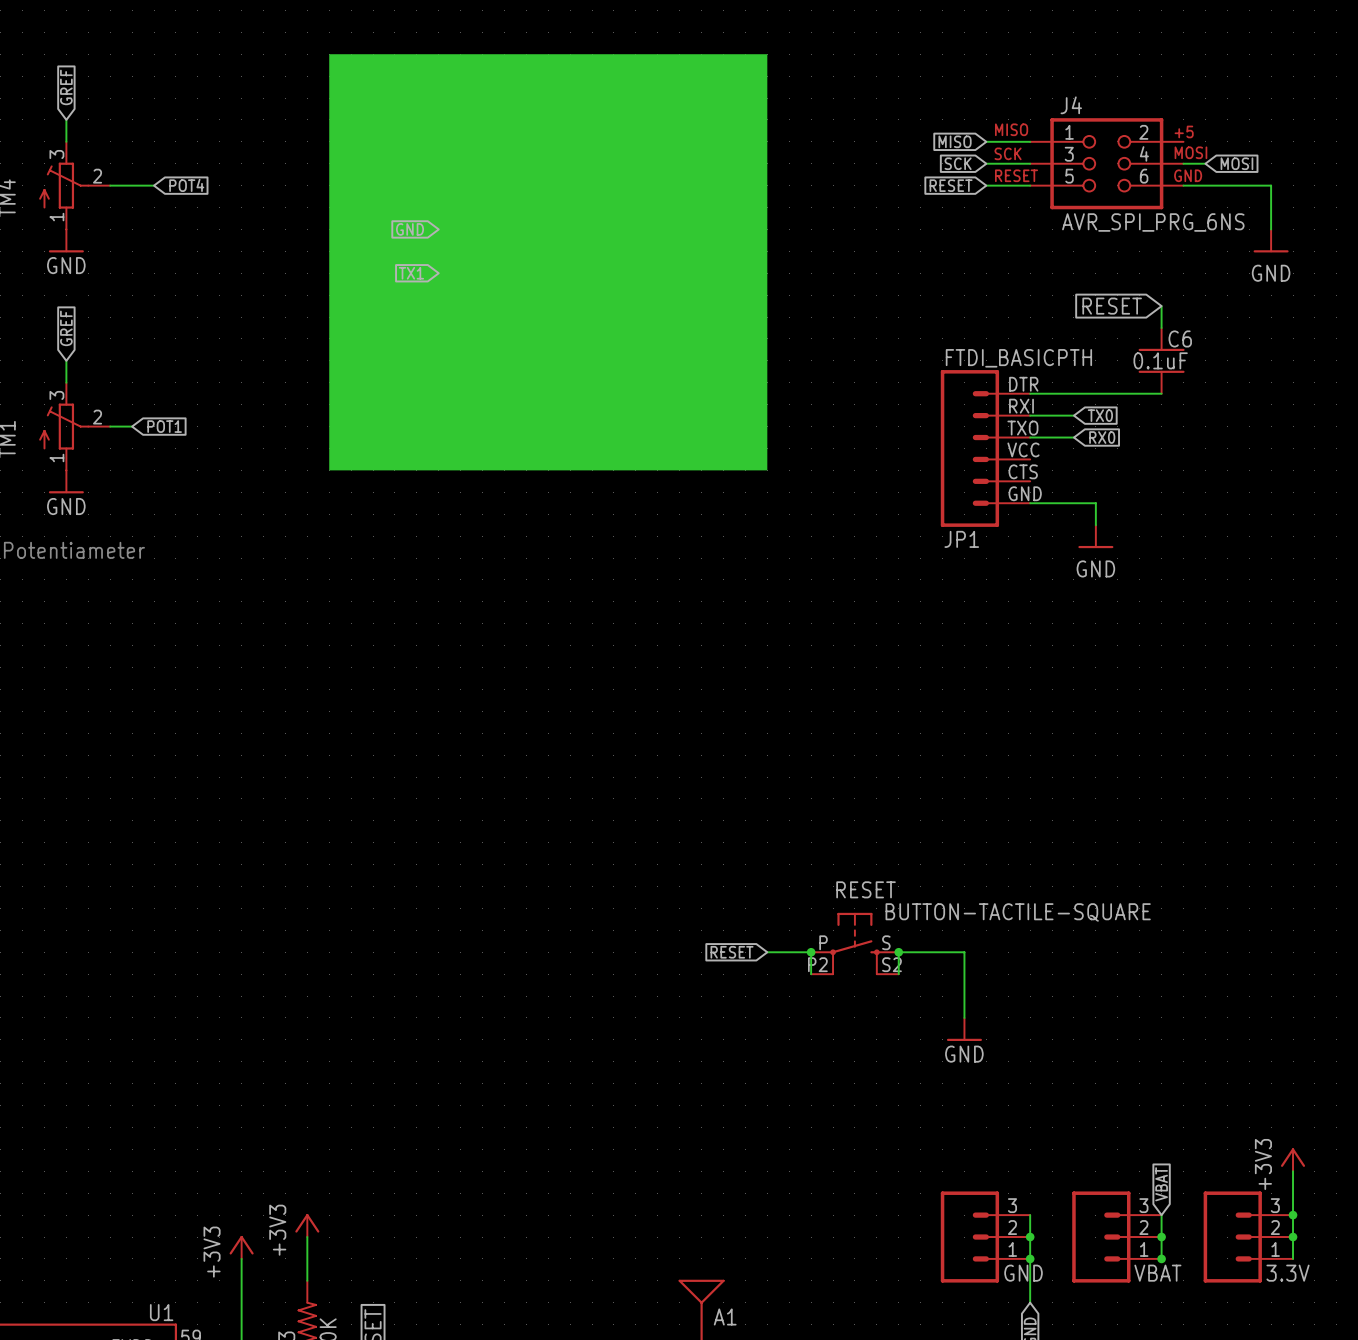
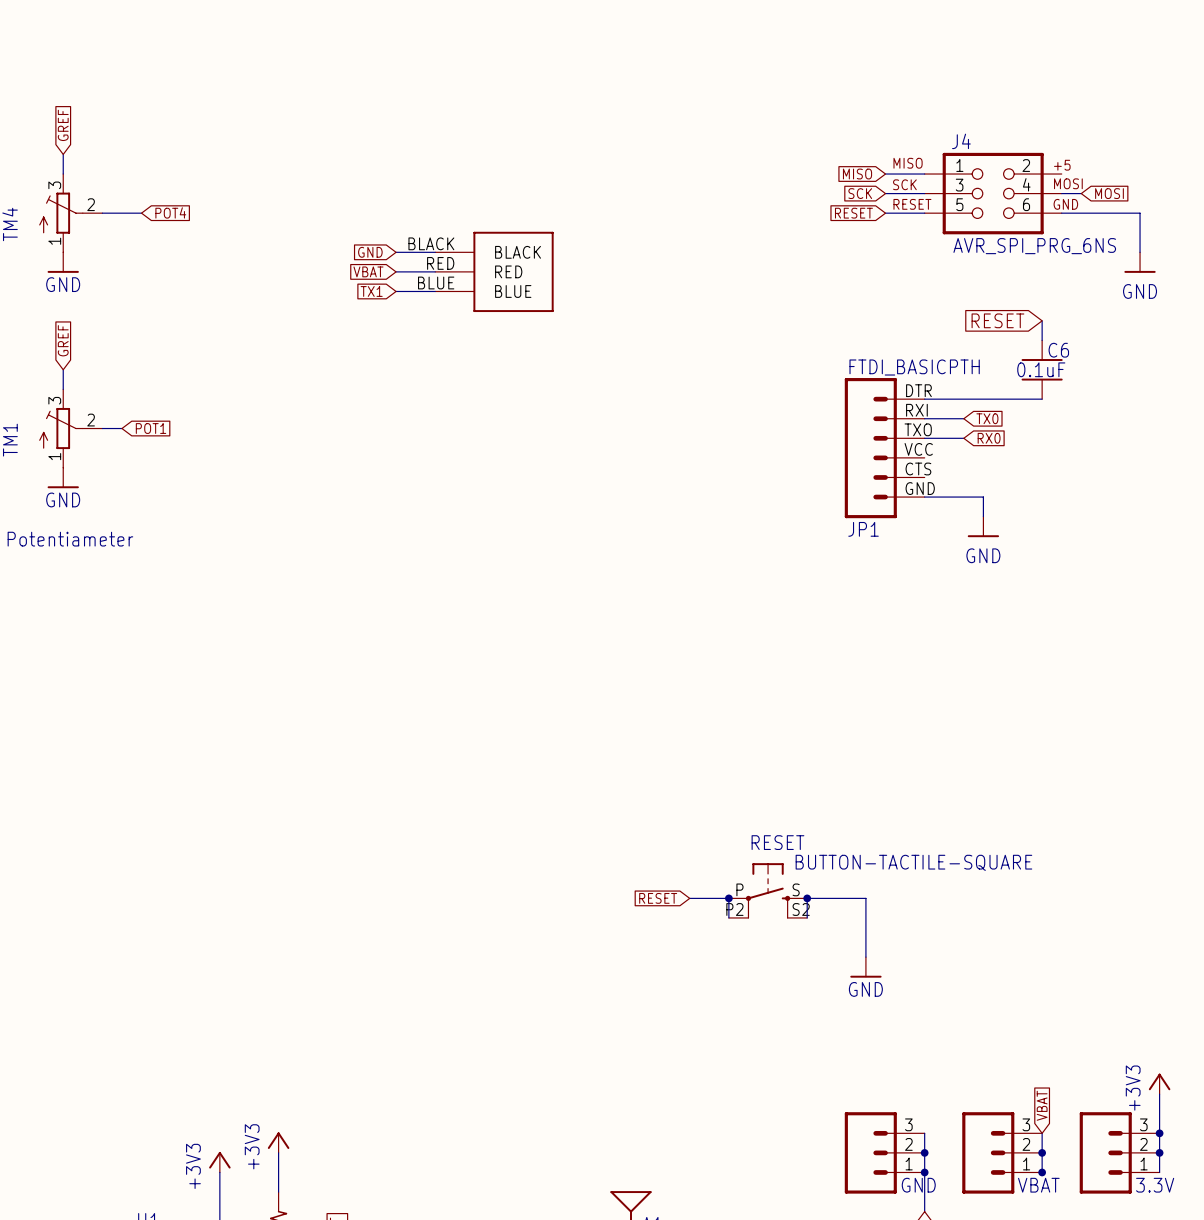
drawing: [329, 54, 768, 471] -> none
global label: none -> VBAT (368, 271)

